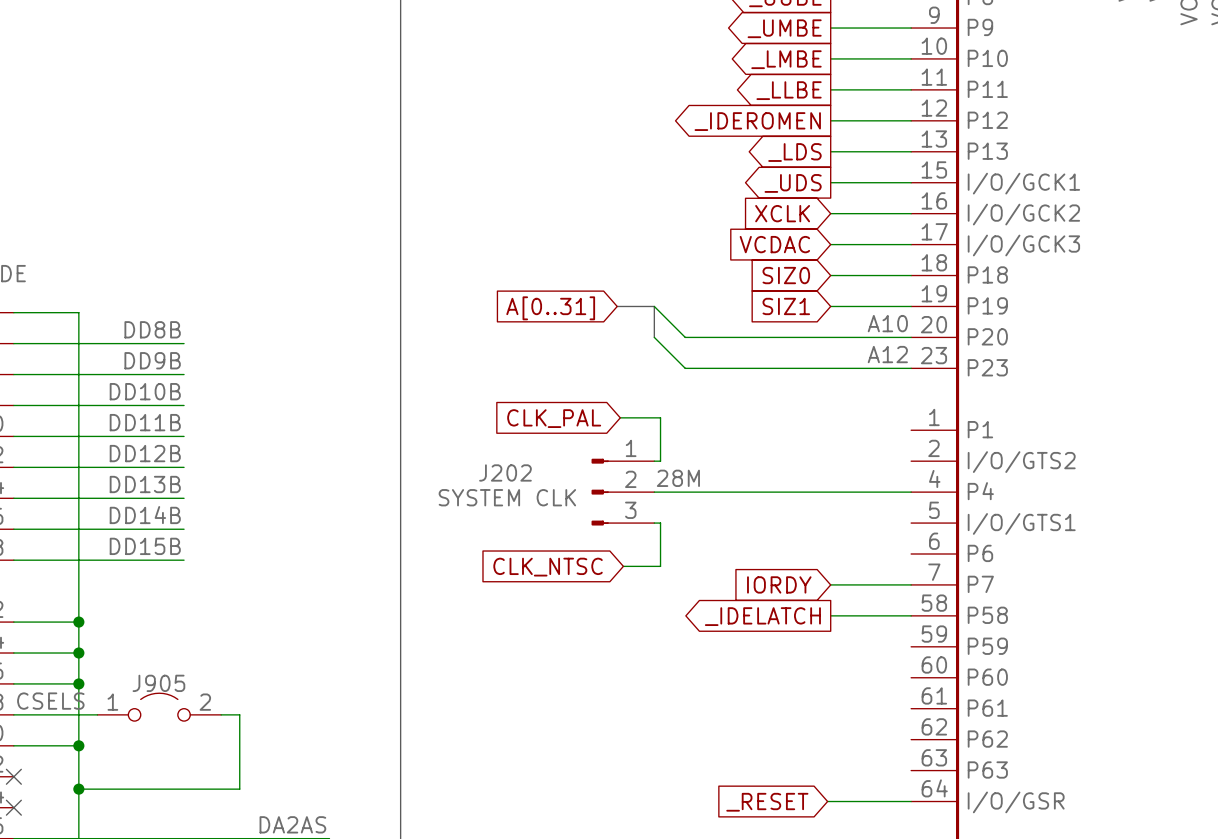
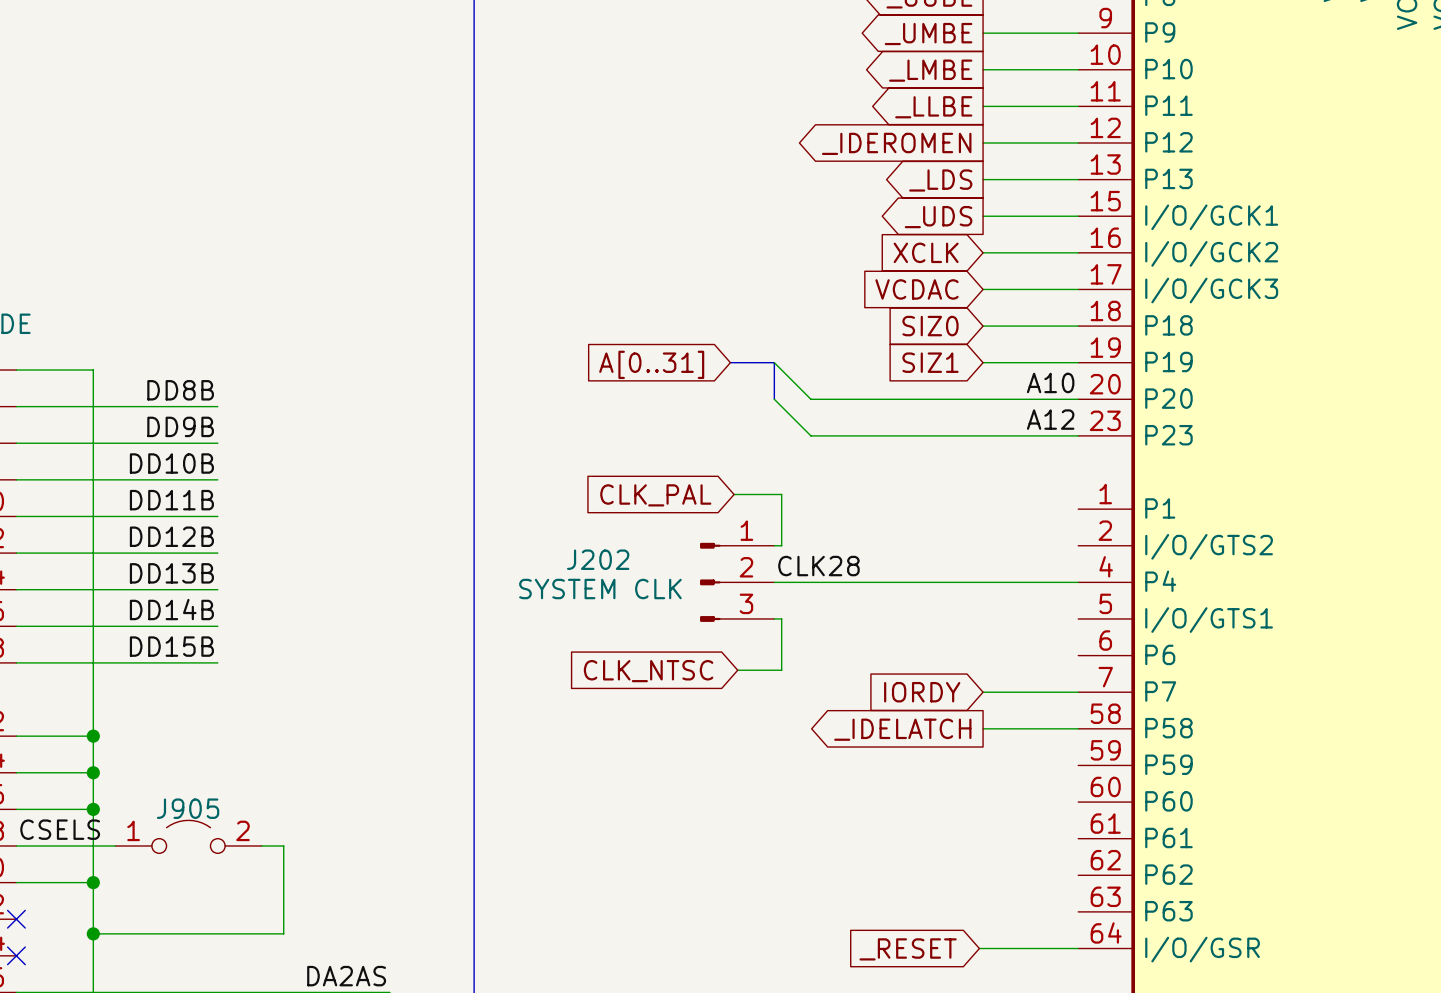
label: 28M (678, 478) -> CLK28 (818, 566)

